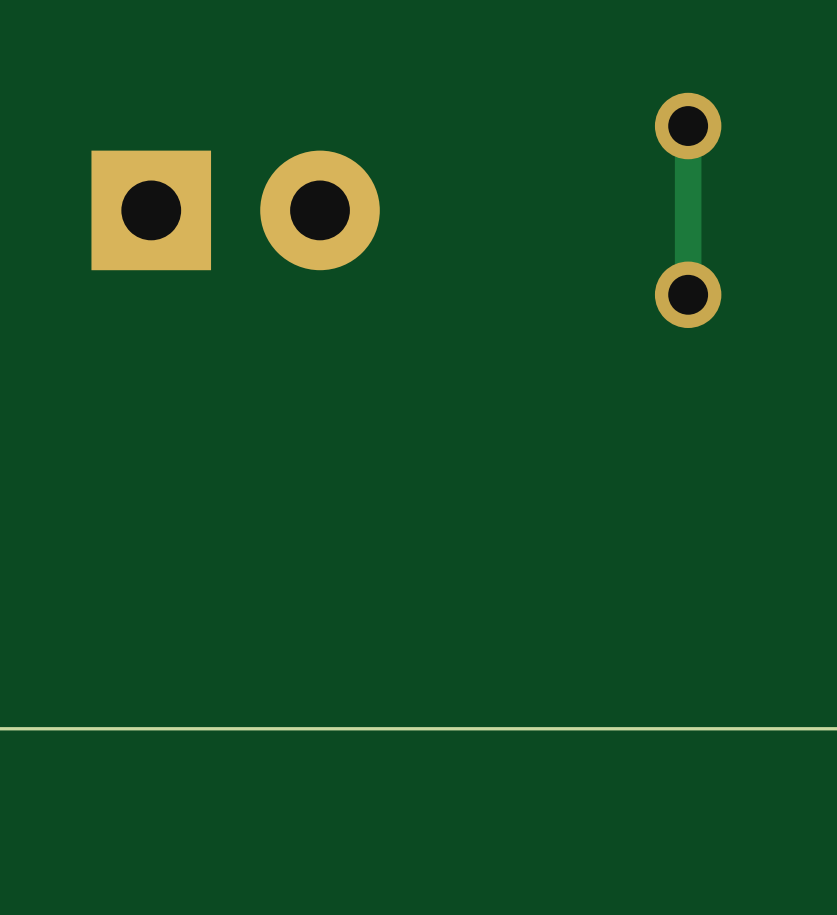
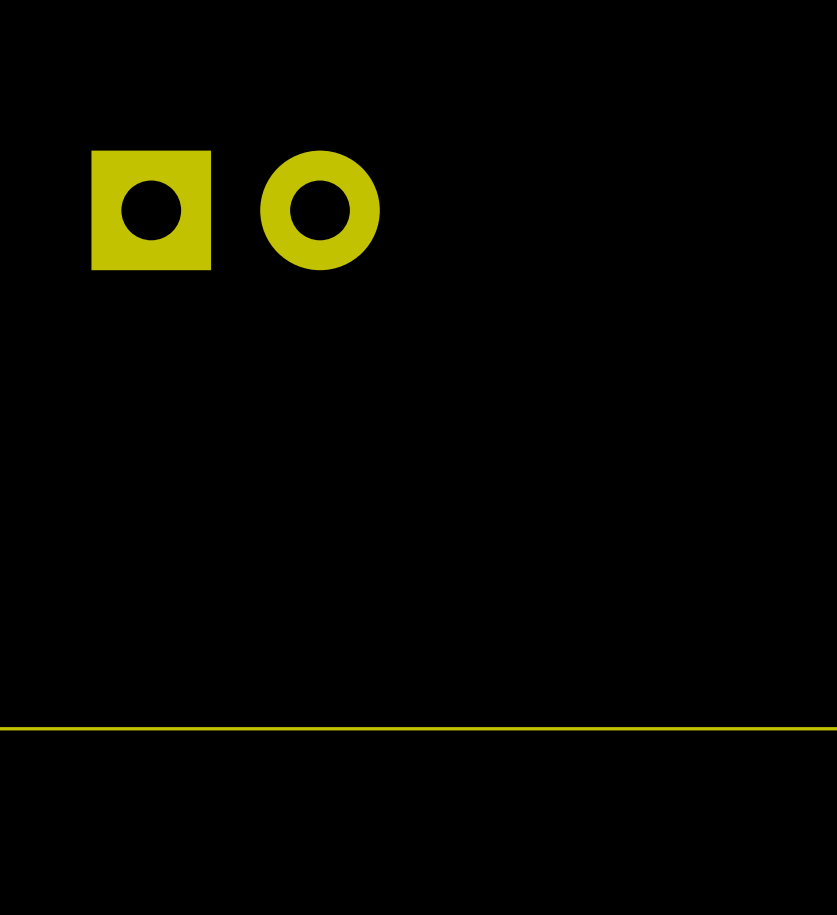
track: (688, 126) (688, 294) -> none
via: (688, 126) -> none
via: (688, 294) -> none

